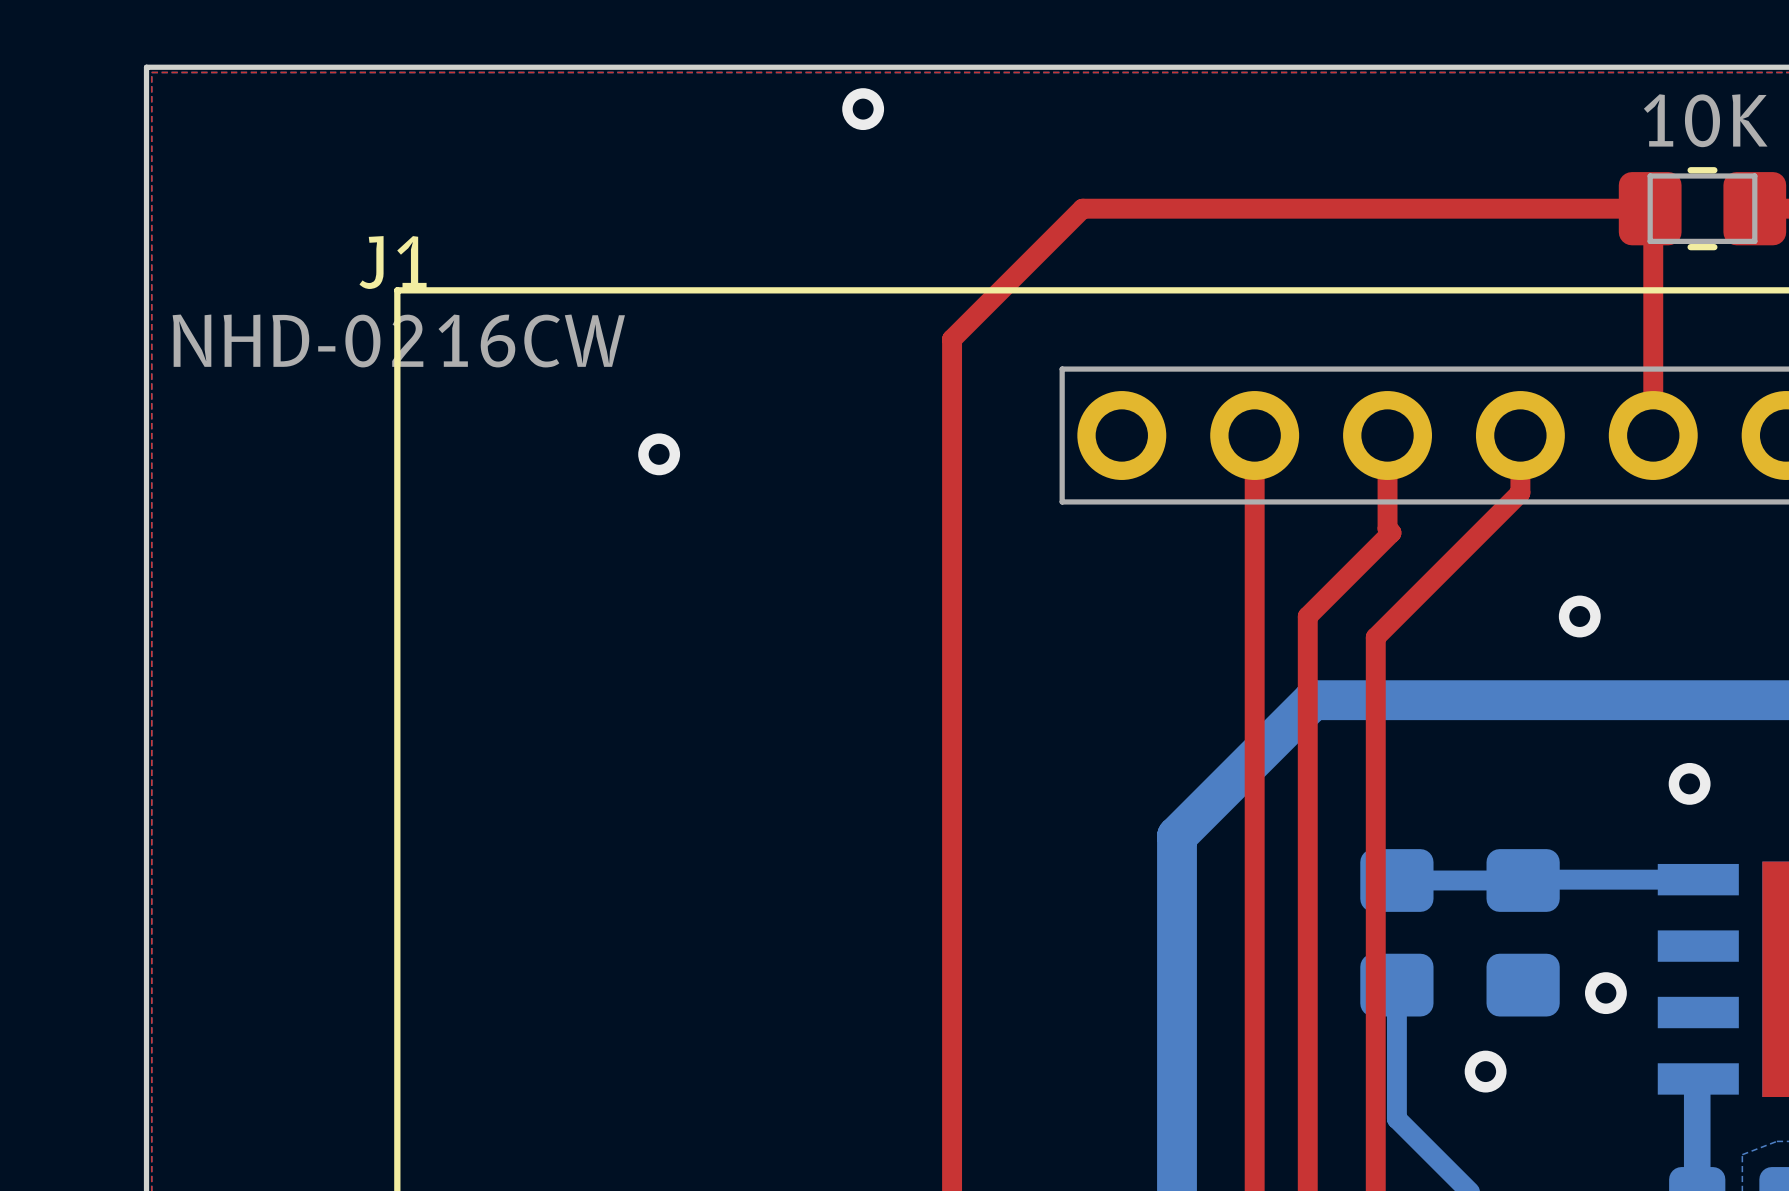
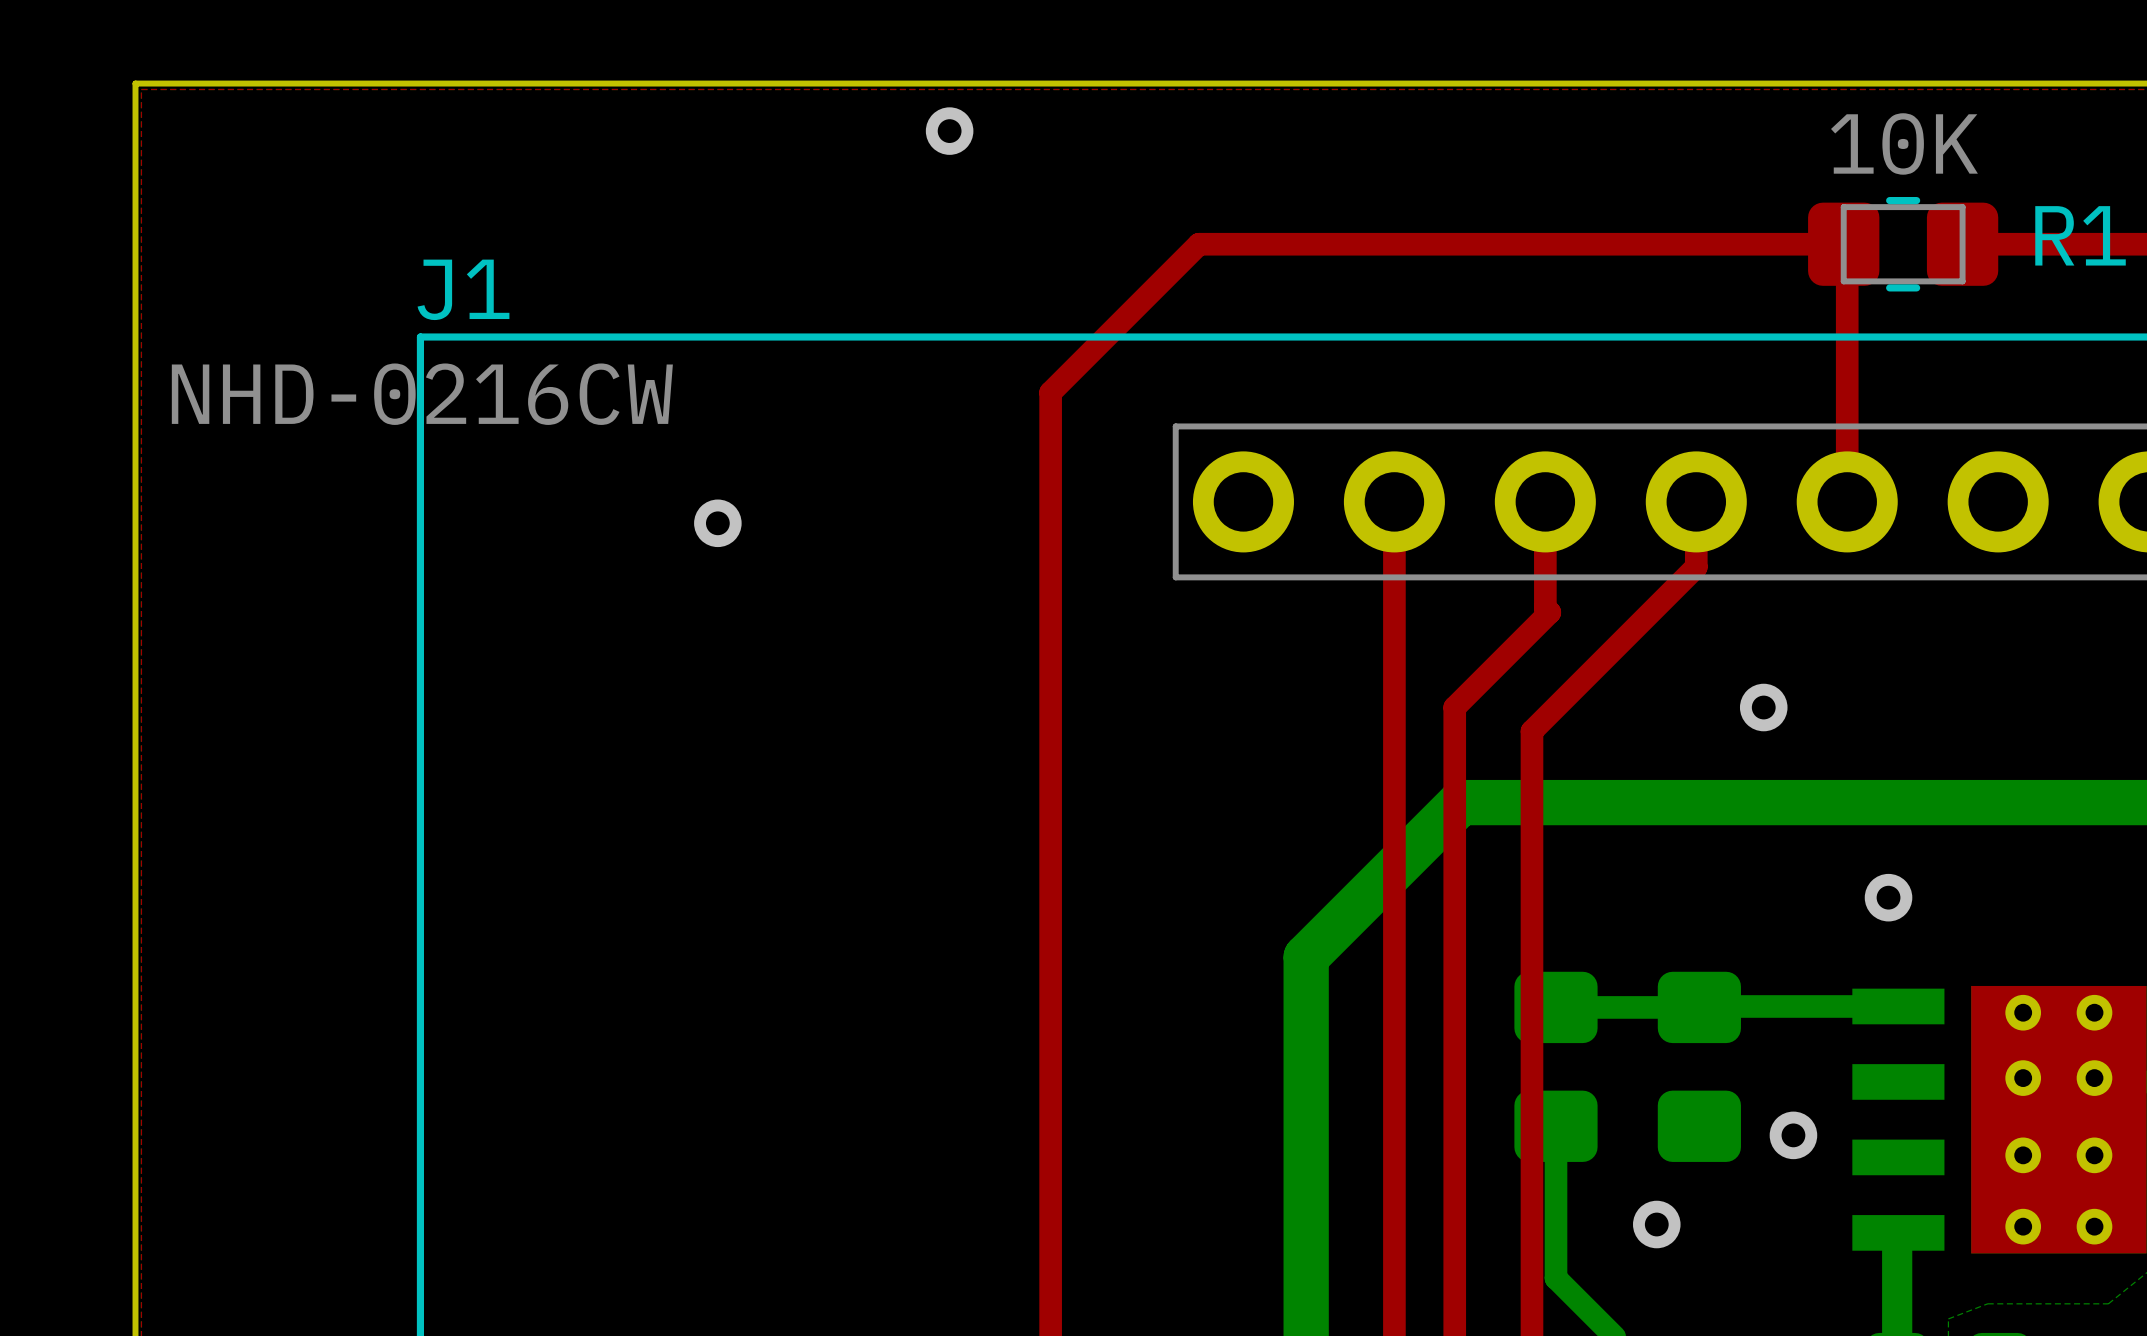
J1 name position: J1 (393, 262) -> J1 (463, 289)

